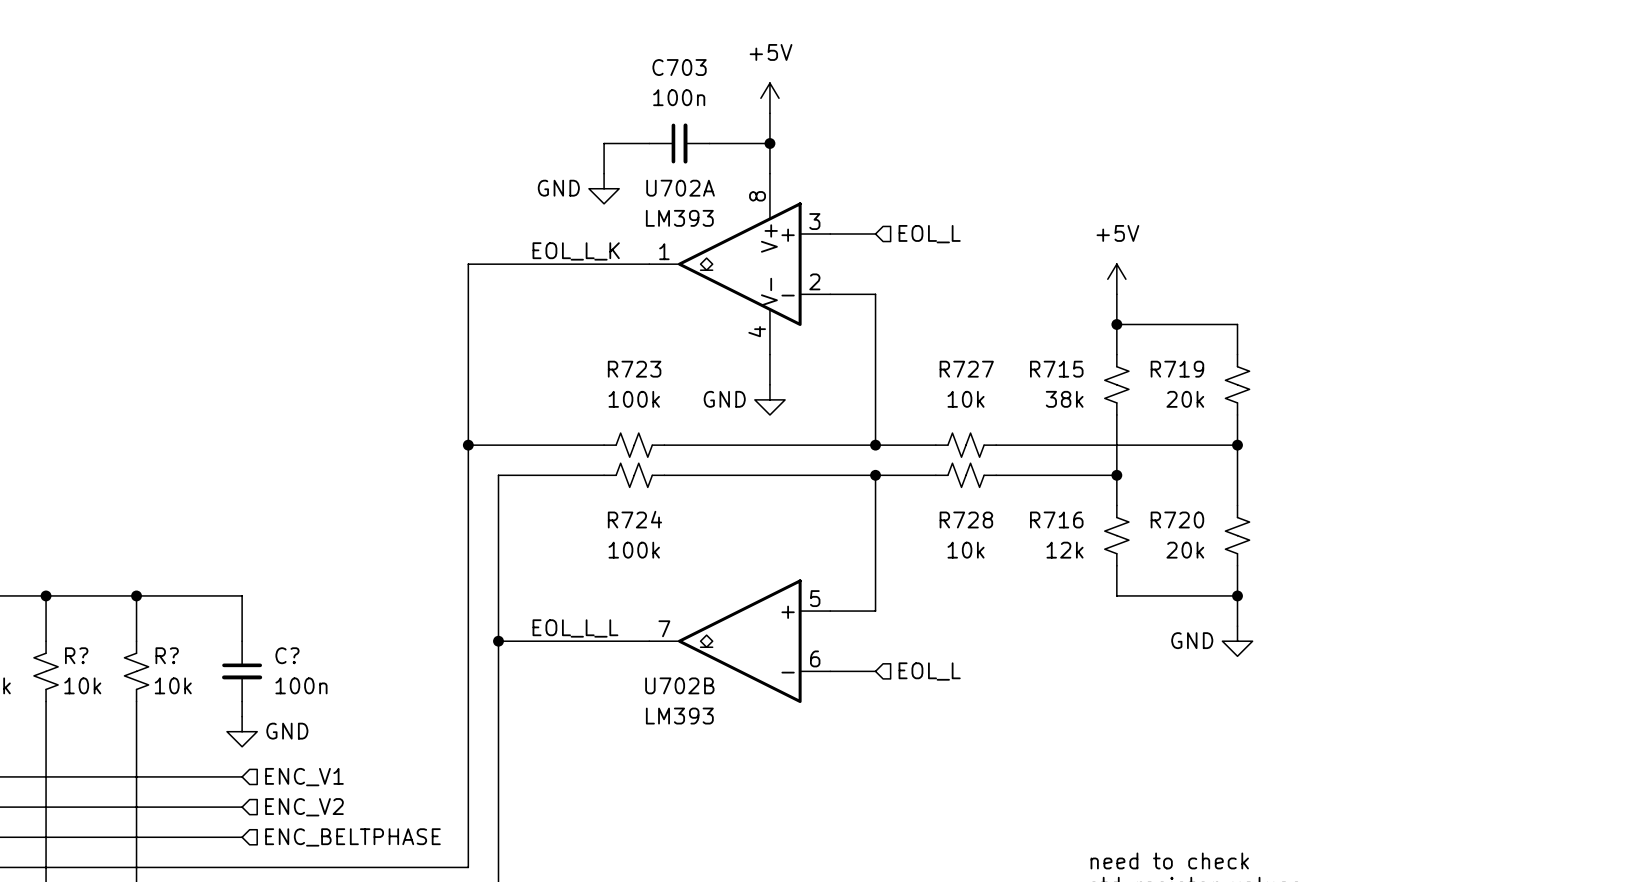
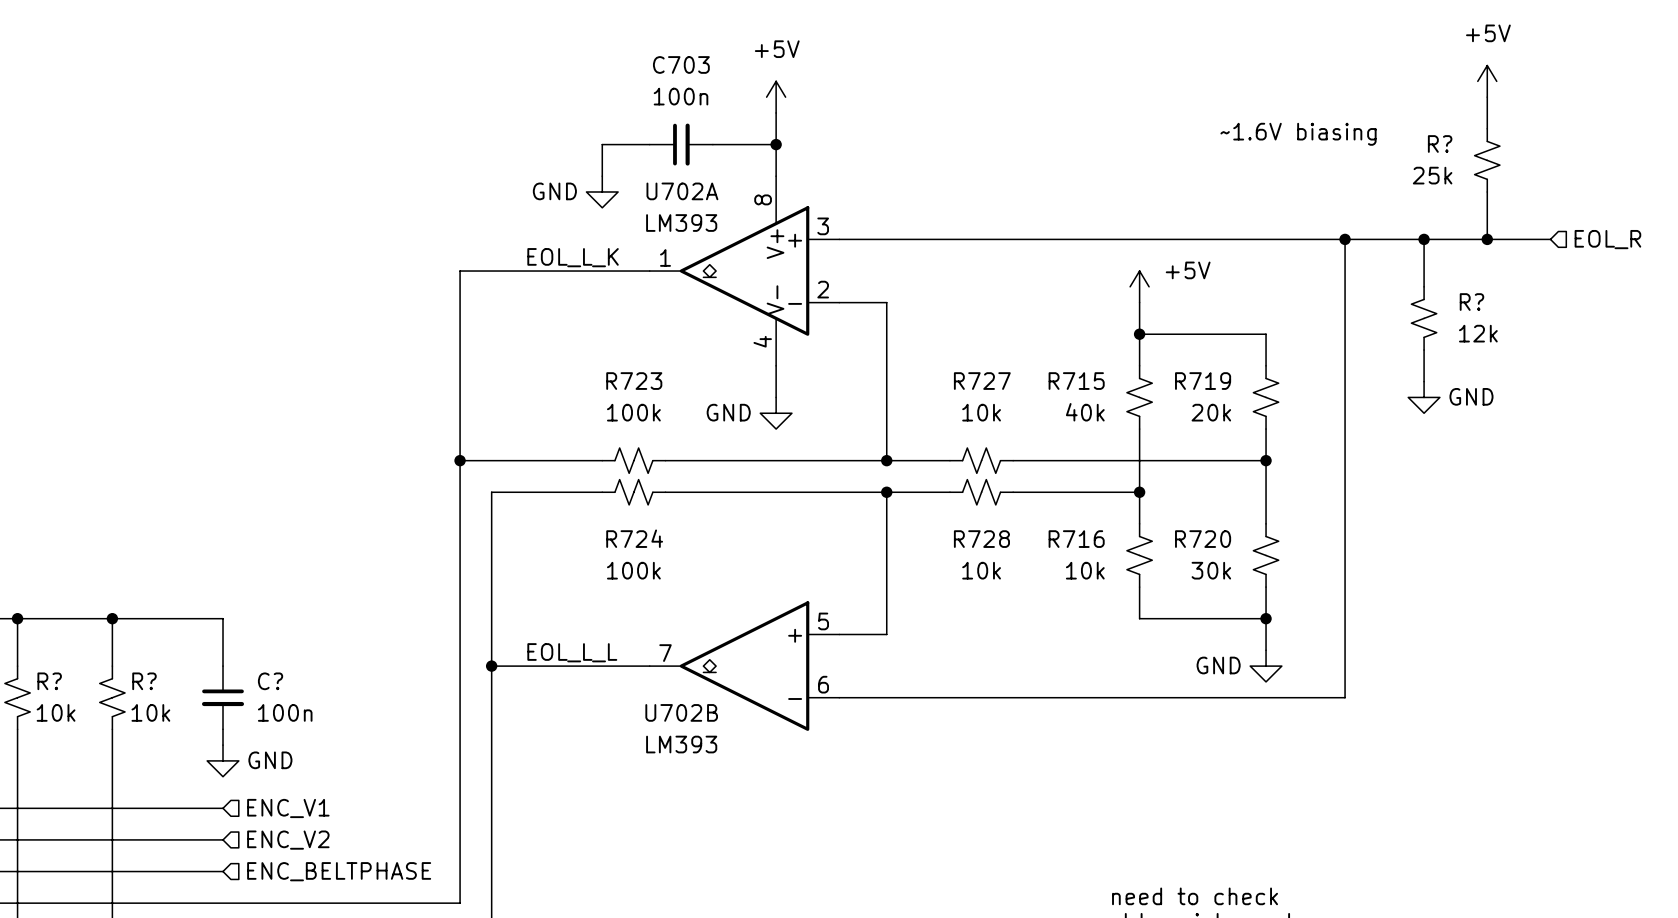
power symbol: none -> +5V (1487, 81)
wire: none -> (1487, 97) (1487, 128)
text: none -> ~1.6V biasing (1298, 134)
R?: none -> 25k (1487, 160)
wire: none -> (1487, 191) (1487, 239)
power symbol text position: +5V (1117, 233) -> +5V (1188, 270)
wire: none -> (886, 239) (1550, 239)
hierarchical label: EOL_L (929, 234) -> none
wire: none -> (1345, 239) (1345, 697) (886, 697)
junction: none -> (1345, 239)
wire: none -> (1424, 239) (1424, 286)
junction: none -> (1424, 239)
junction: none -> (1487, 239)
hierarchical label: none -> EOL_R (1607, 239)
R?: none -> 12k (1424, 318)
wire: none -> (1424, 350) (1424, 381)
power symbol: none -> GND (1424, 397)
R715 value: 38k (1064, 399) -> 40k (1085, 412)
R716 value: 12k (1065, 550) -> 10k (1085, 570)
R720 value: 20k (1185, 550) -> 30k (1211, 570)
hierarchical label: EOL_L (929, 671) -> none

